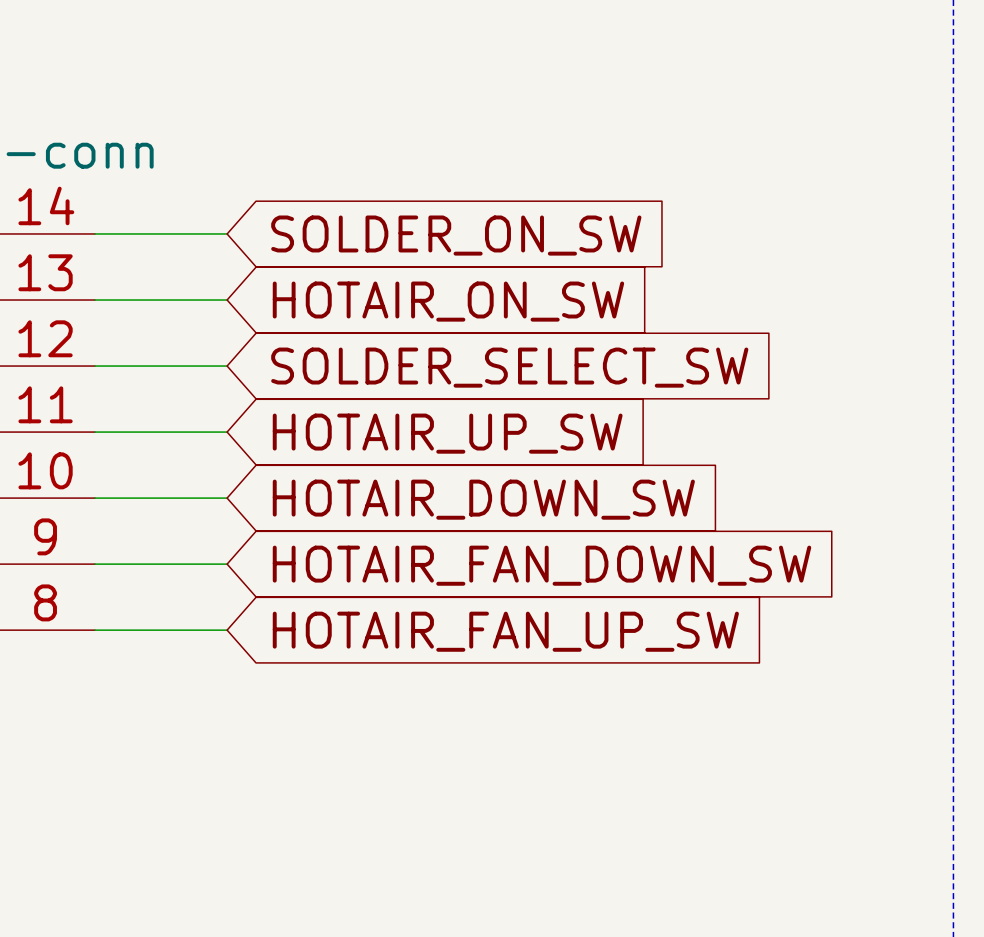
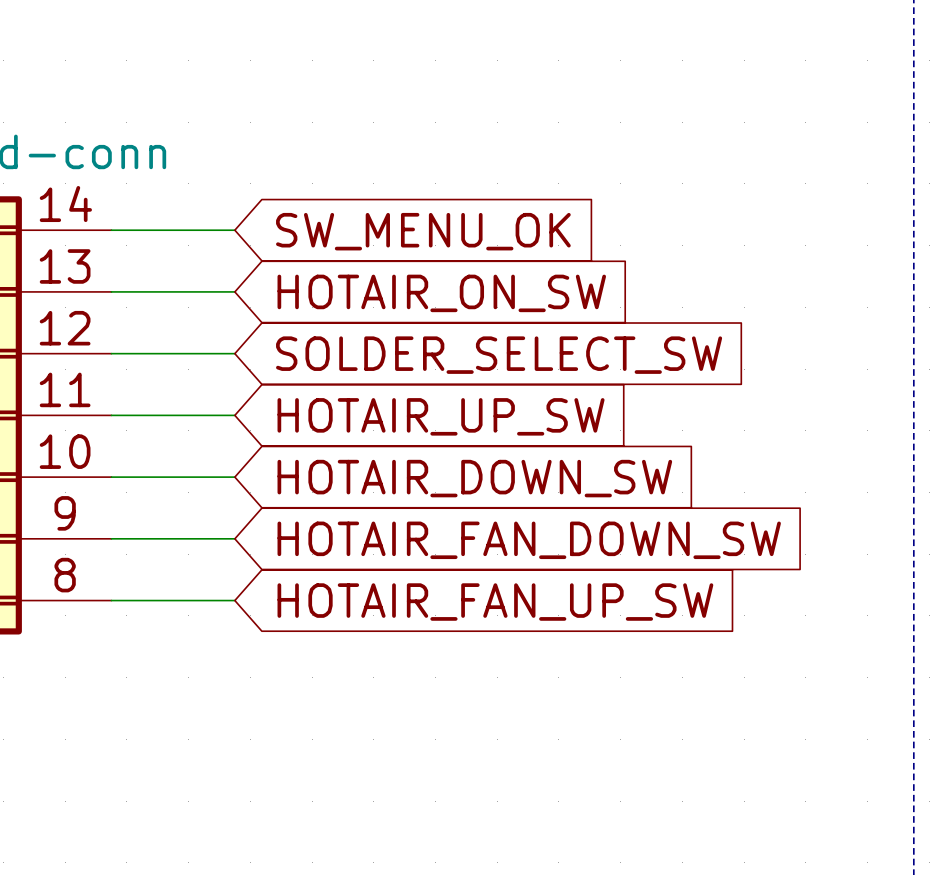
global label: SOLDER_ON_SW (456, 235) -> SW_MENU_OK (423, 231)

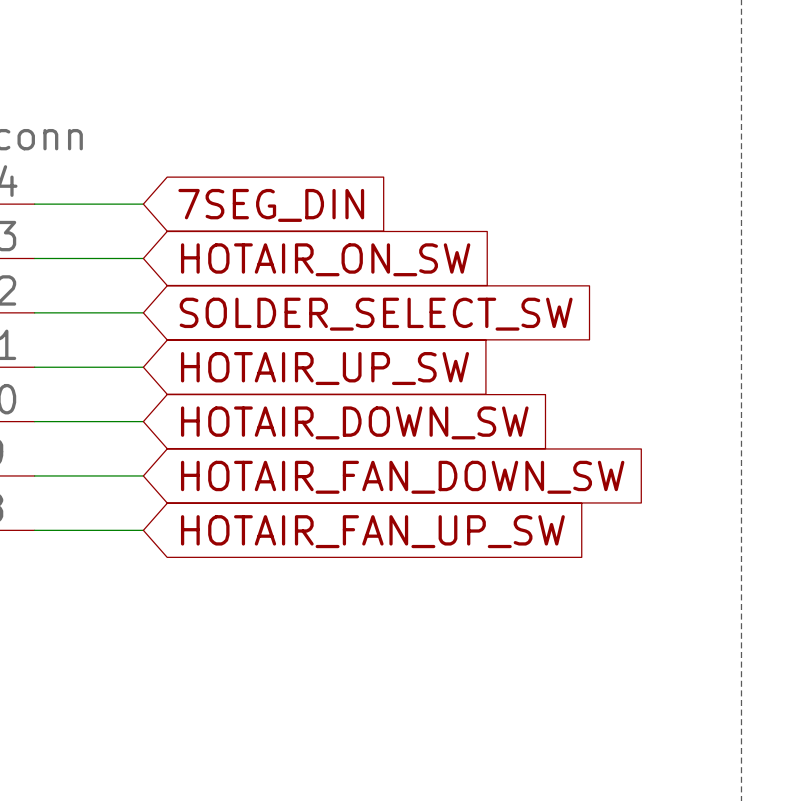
global label: SW_MENU_OK (423, 231) -> 7SEG_DIN (271, 205)

